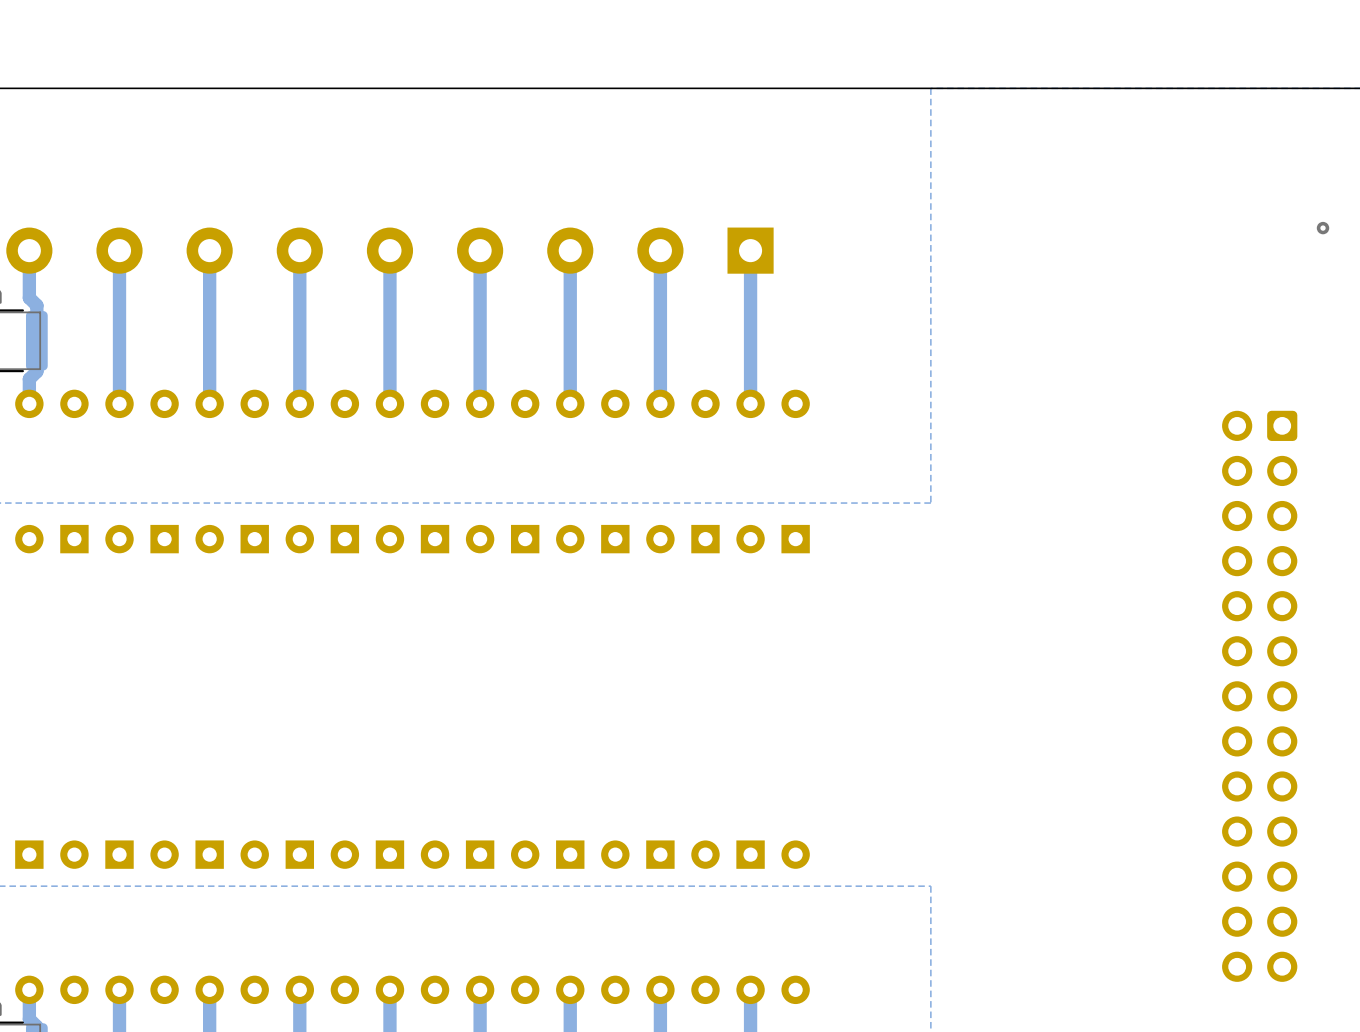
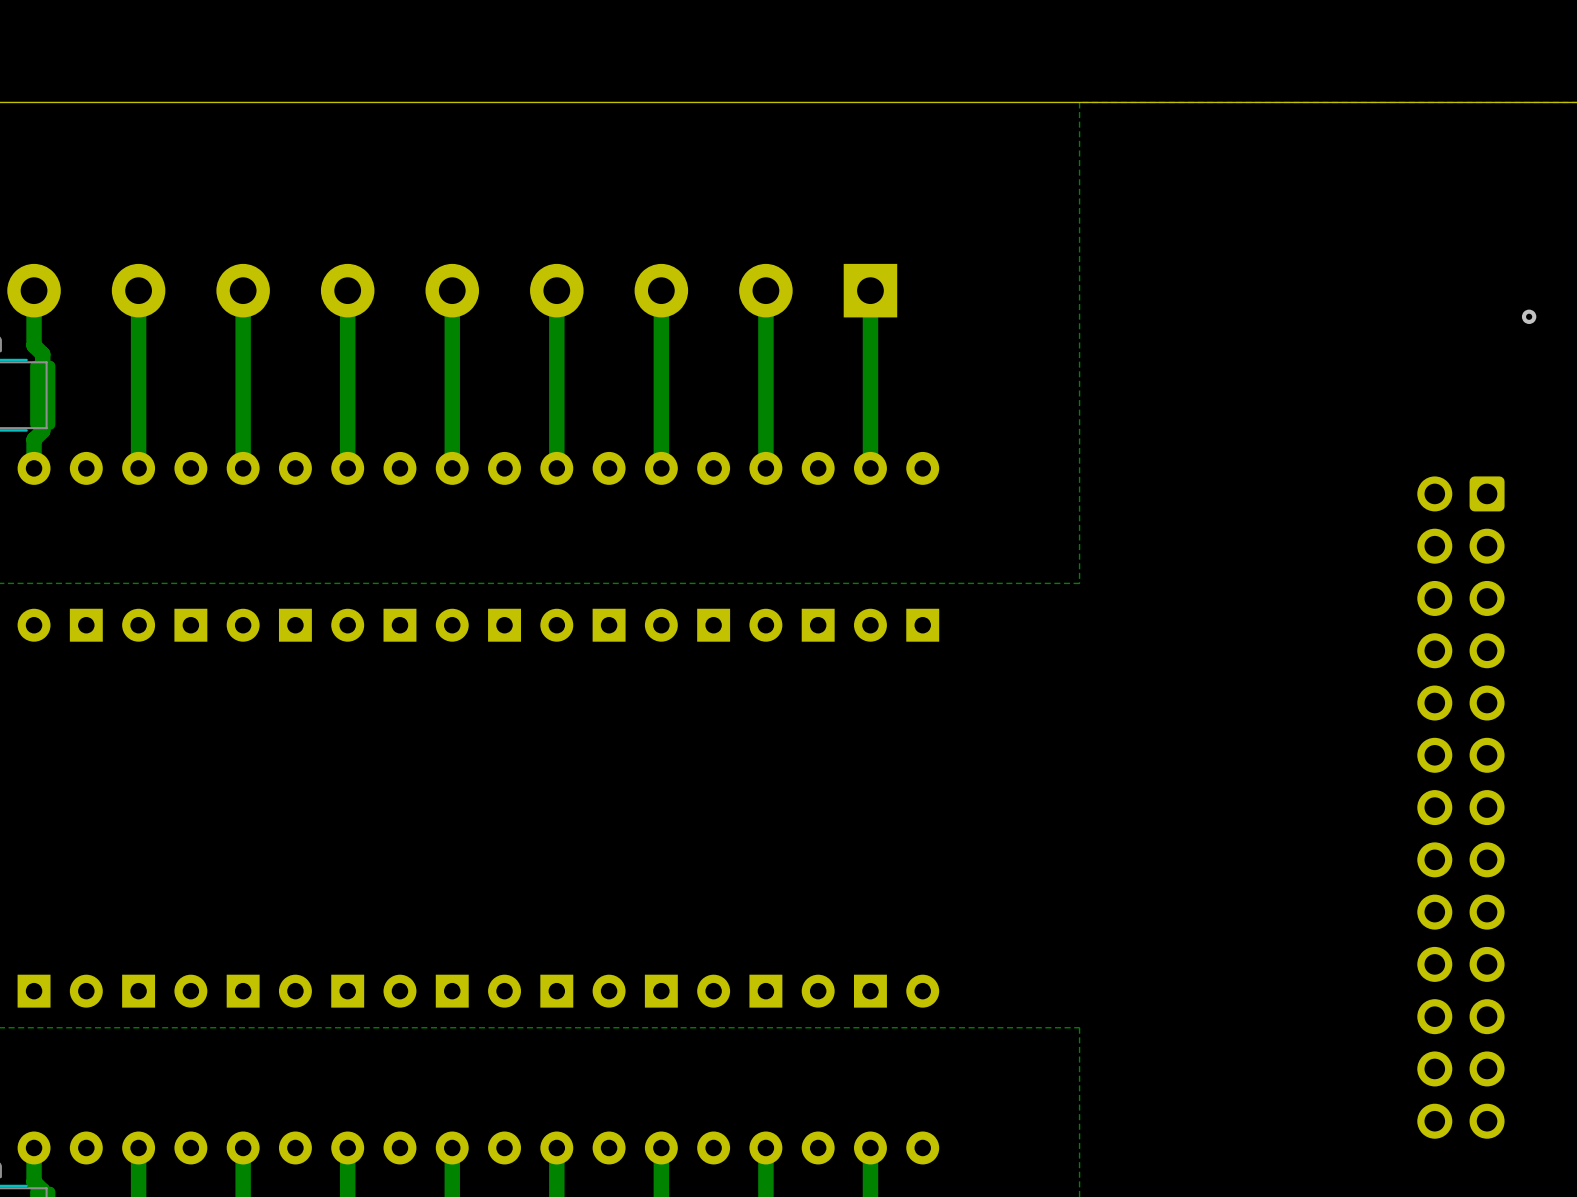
via position: (1323, 228) -> (1529, 316)

